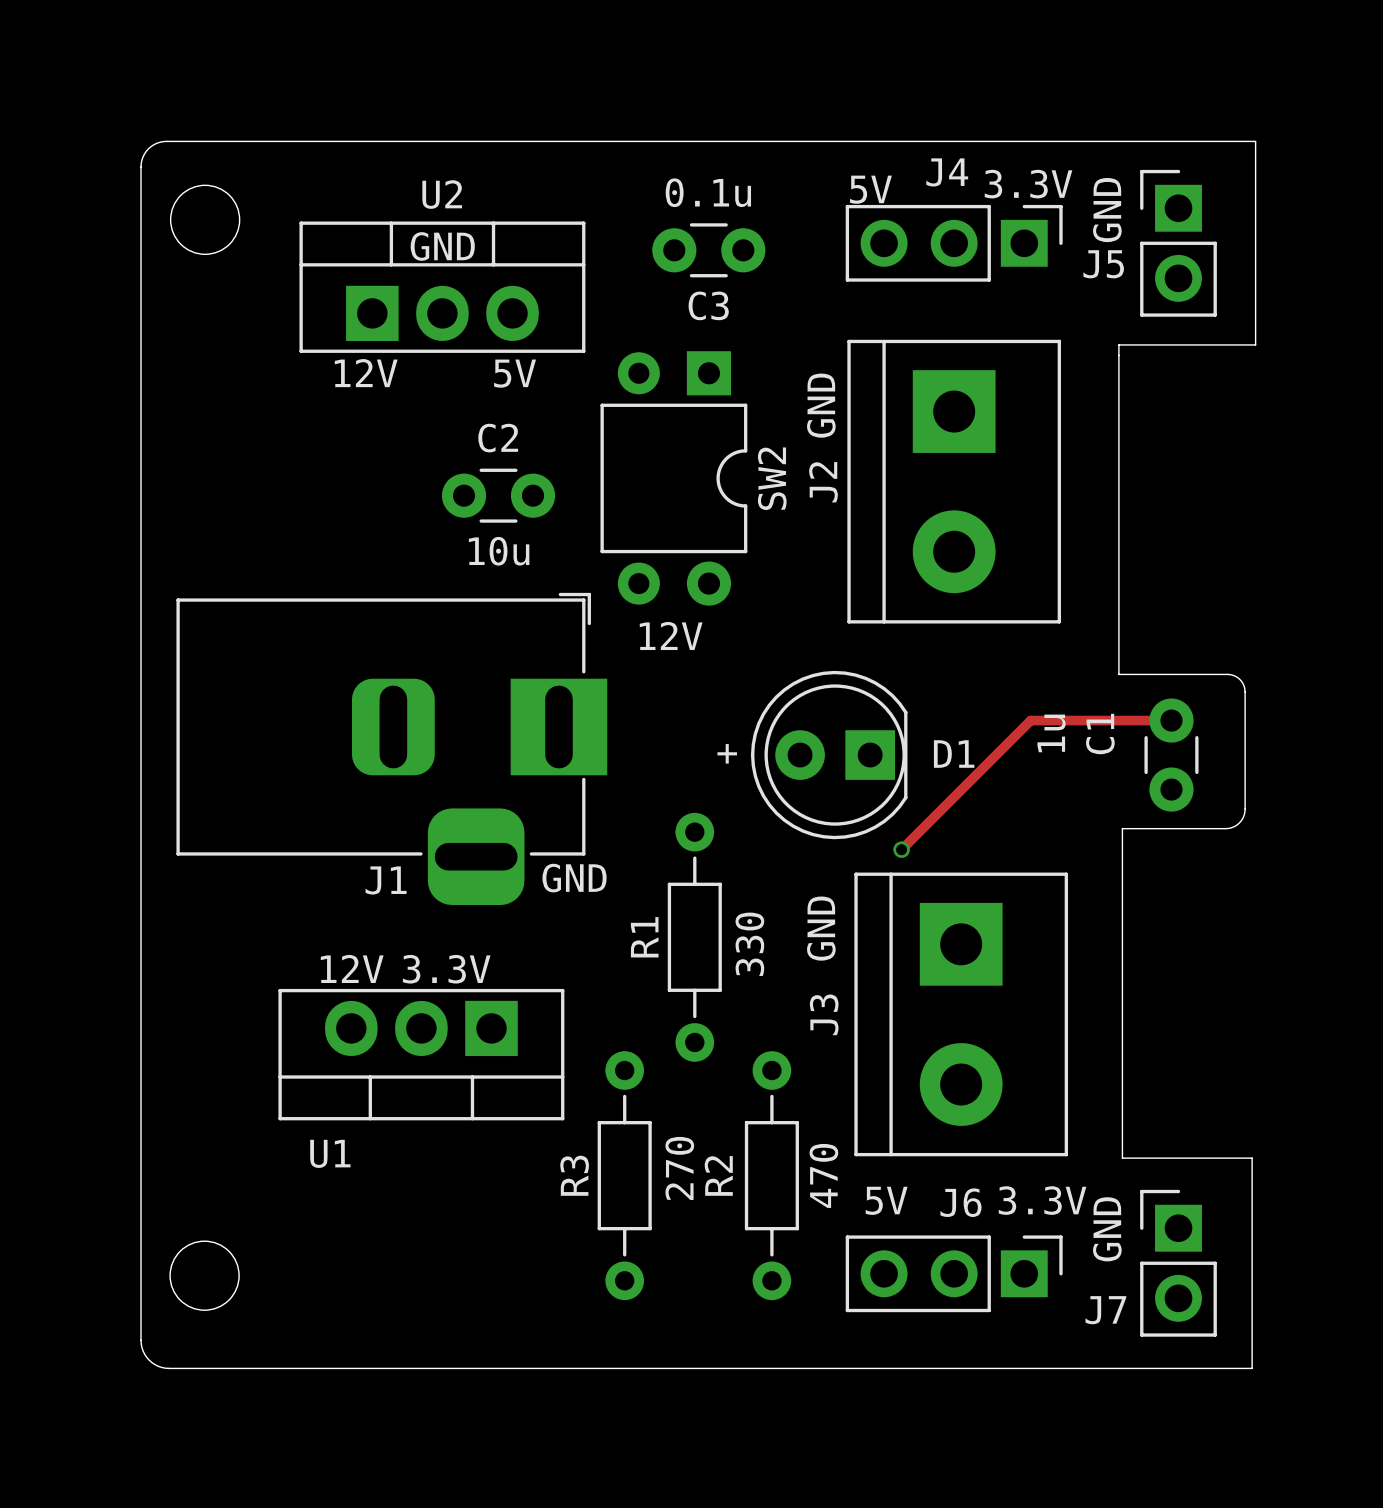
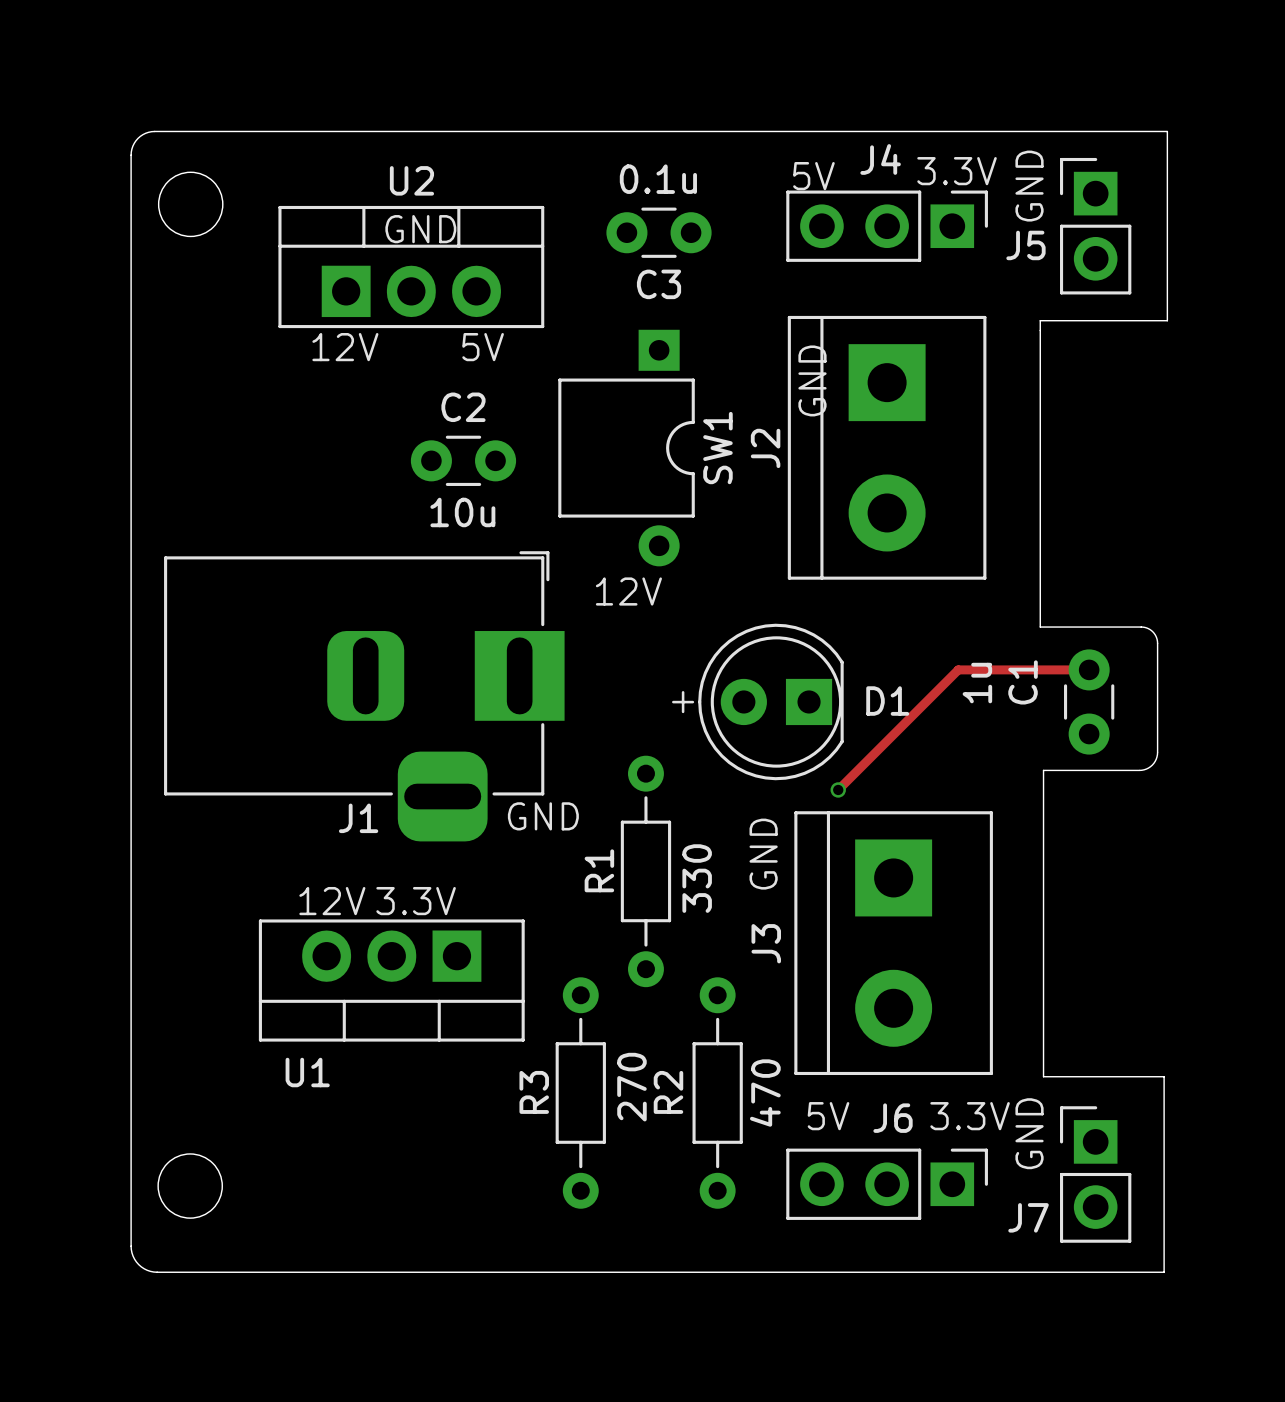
text position: GND (821, 405) -> GND (812, 380)
SW2: (673, 478) -> none
SW1: none -> (626, 448)

